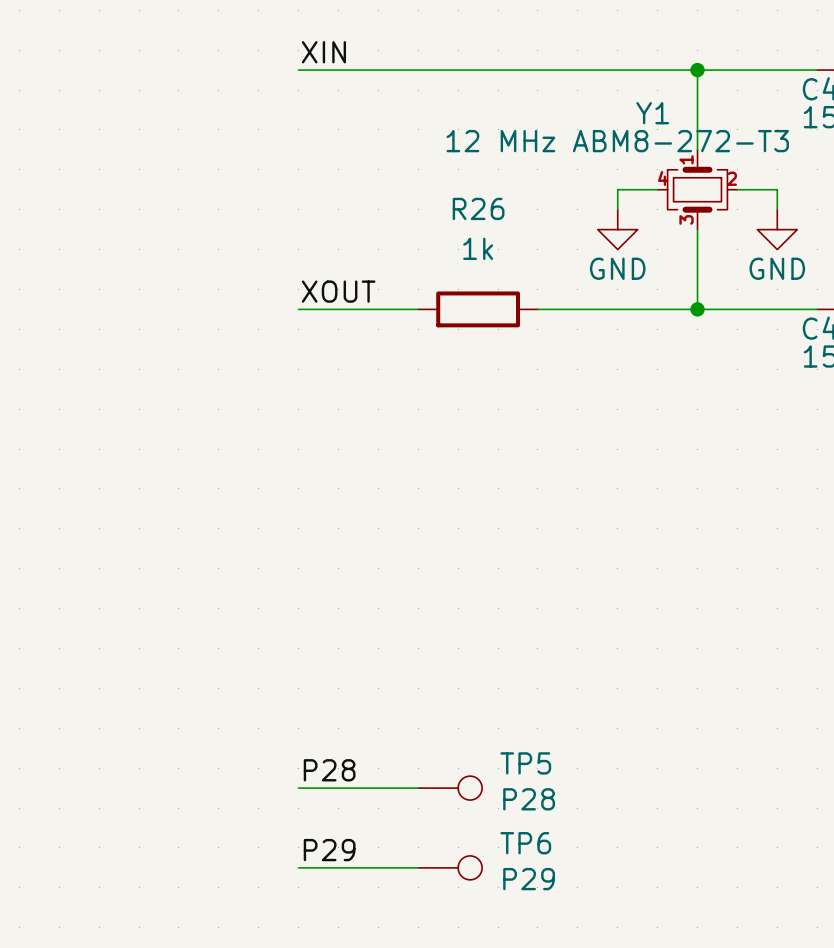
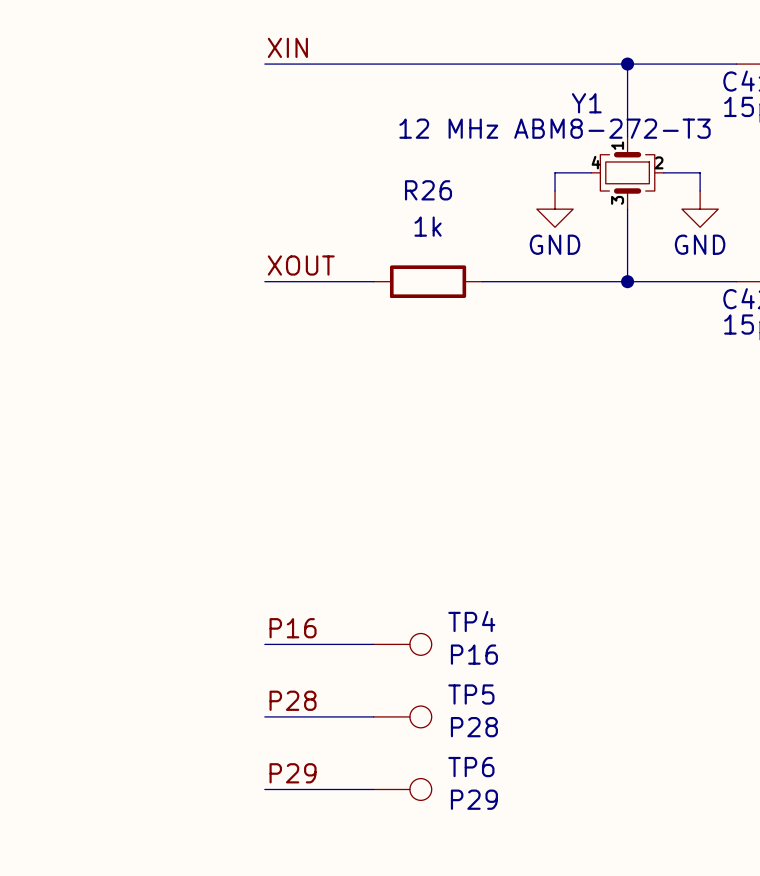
label: none -> P16 (293, 628)
wire: none -> (264, 644) (373, 644)
TP4: none -> P16 (402, 644)

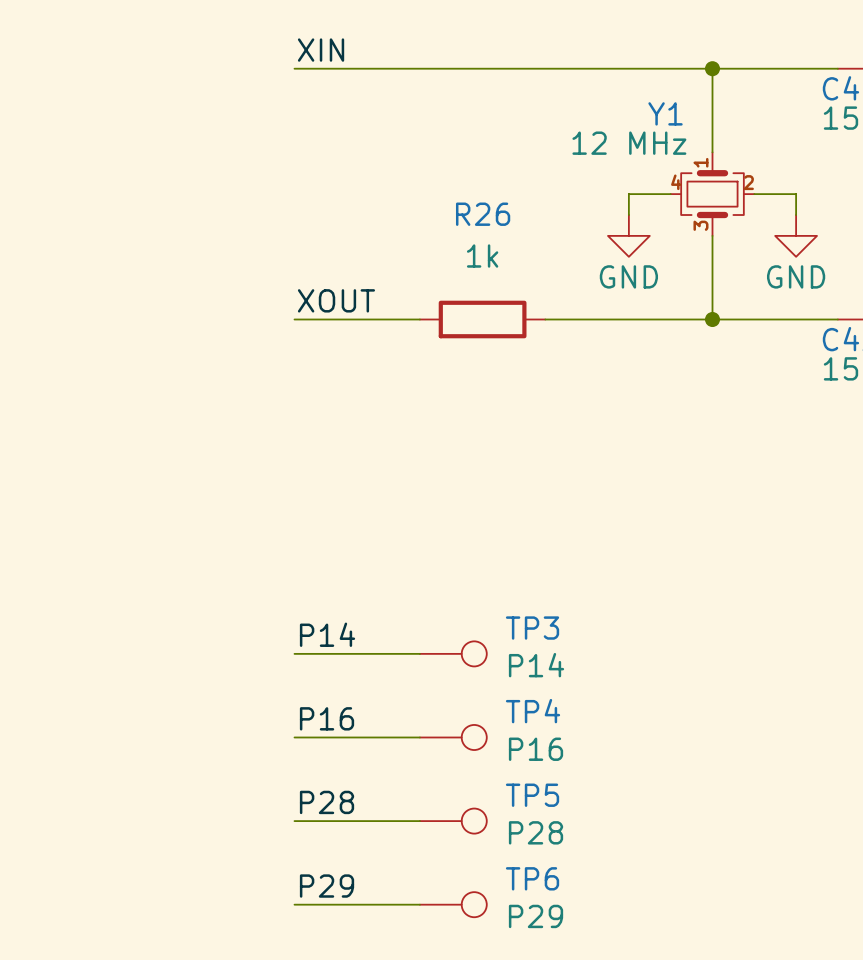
Y1 value: 12 MHz ABM8-272-T3 (555, 128) -> 12 MHz (629, 143)
label: none -> P14 (327, 634)
wire: none -> (294, 653) (419, 653)
TP3: none -> P14 (453, 653)

